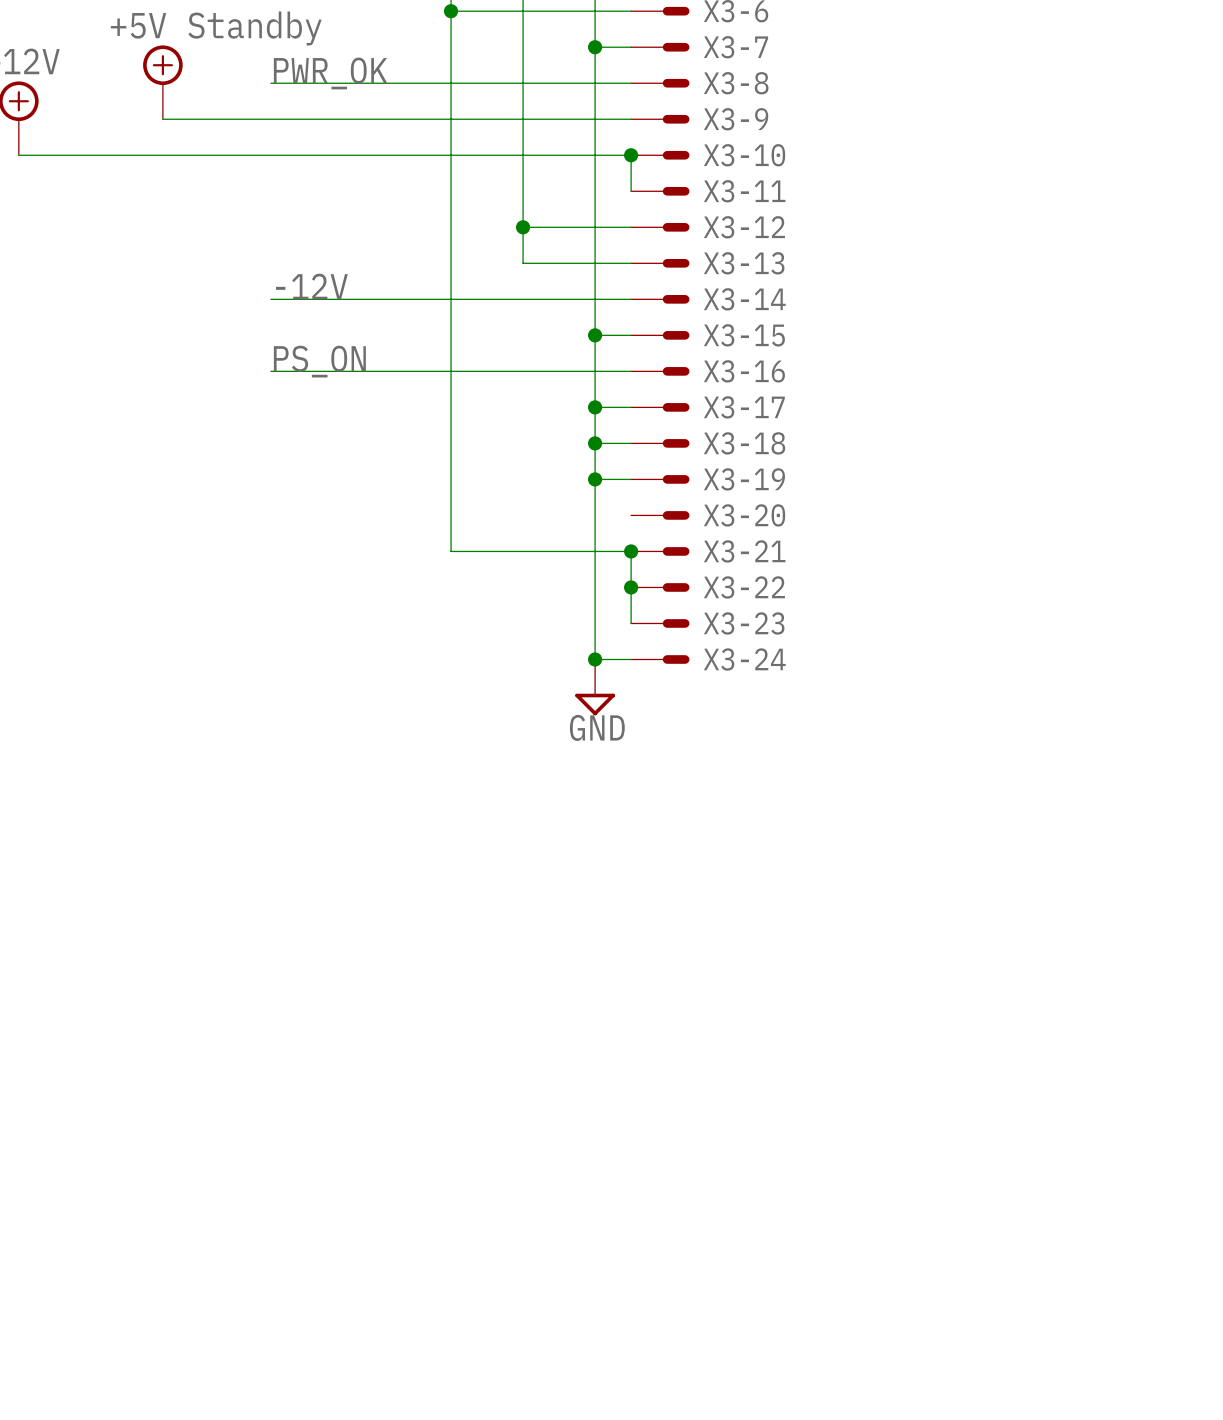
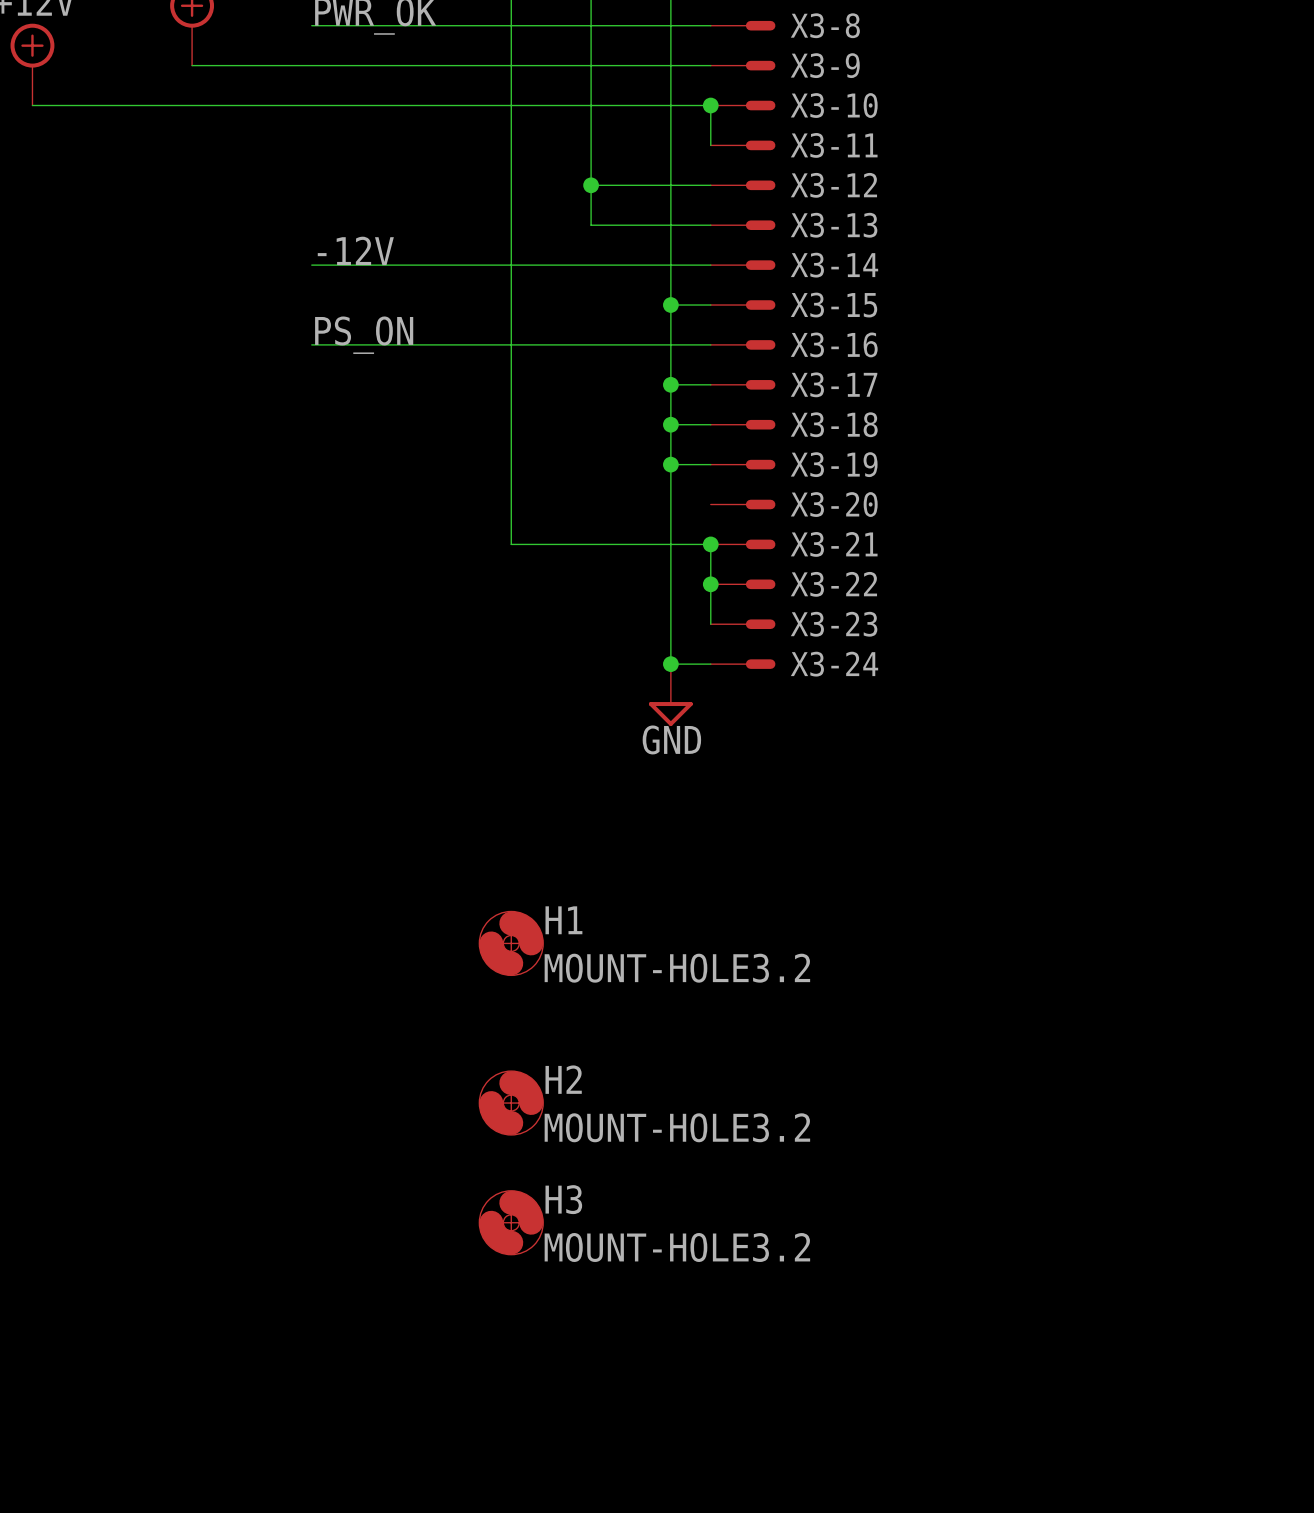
H1: none -> MOUNT-HOLE3.2 (511, 943)
H2: none -> MOUNT-HOLE3.2 (511, 1103)
H3: none -> MOUNT-HOLE3.2 (511, 1222)

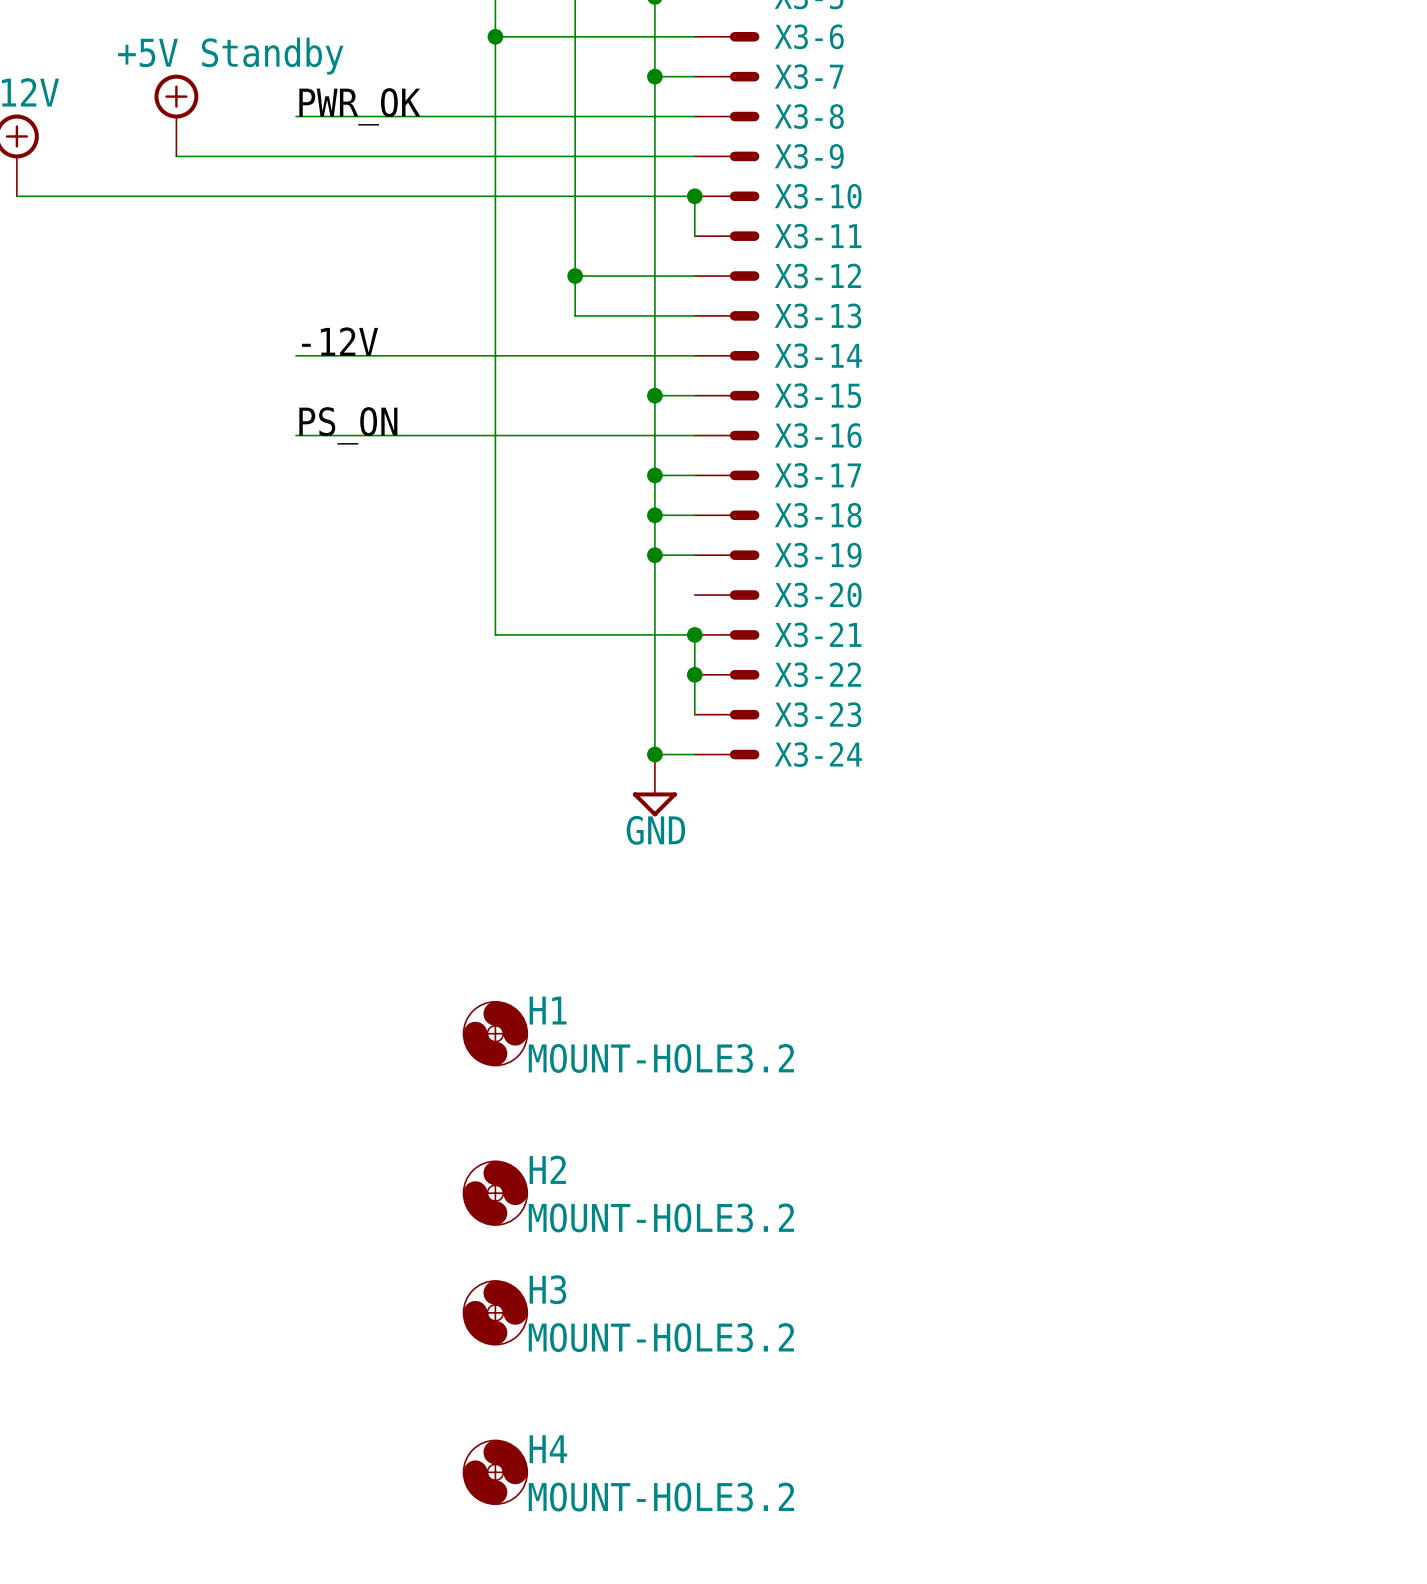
H4: none -> MOUNT-HOLE3.2 (495, 1472)

